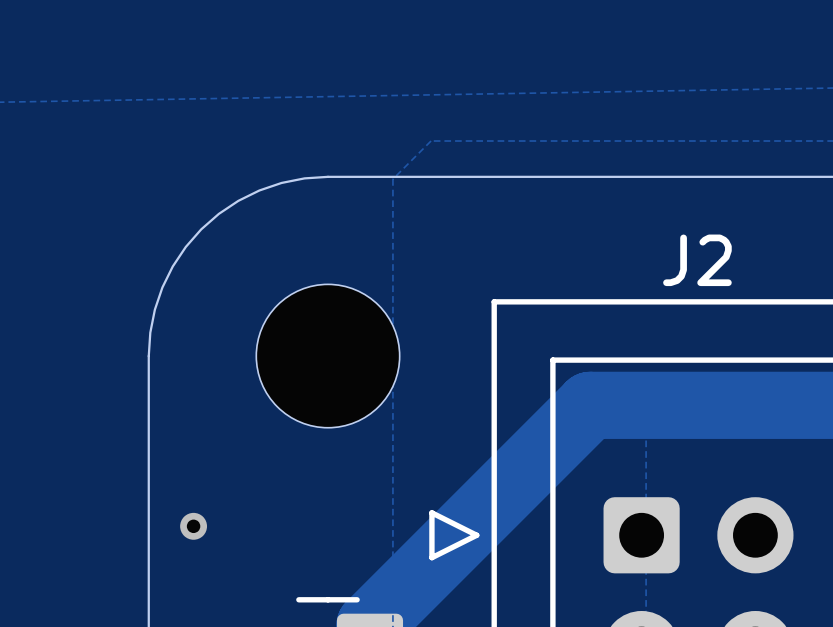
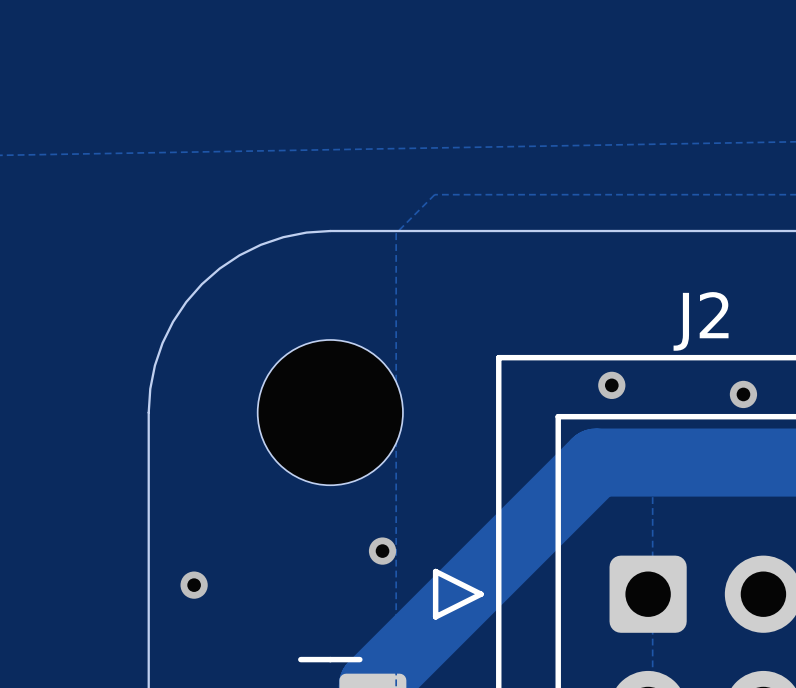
via: none -> (611, 385)
via: none -> (743, 394)
via: none -> (382, 551)

